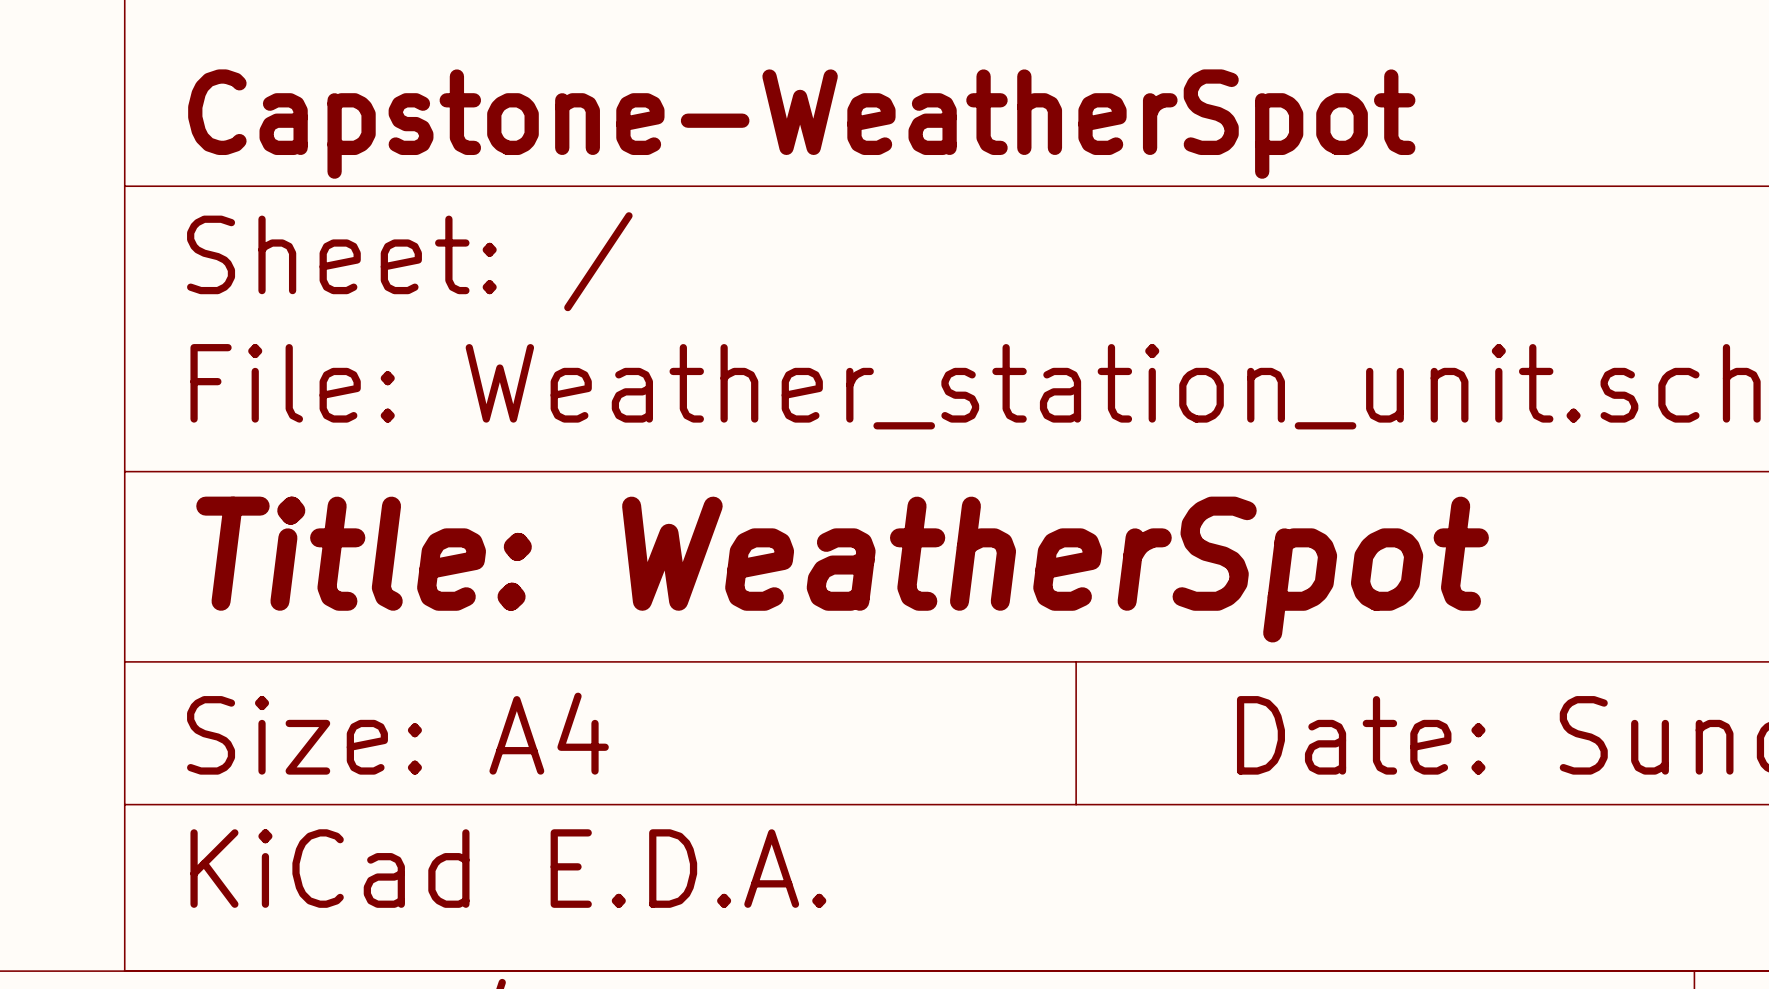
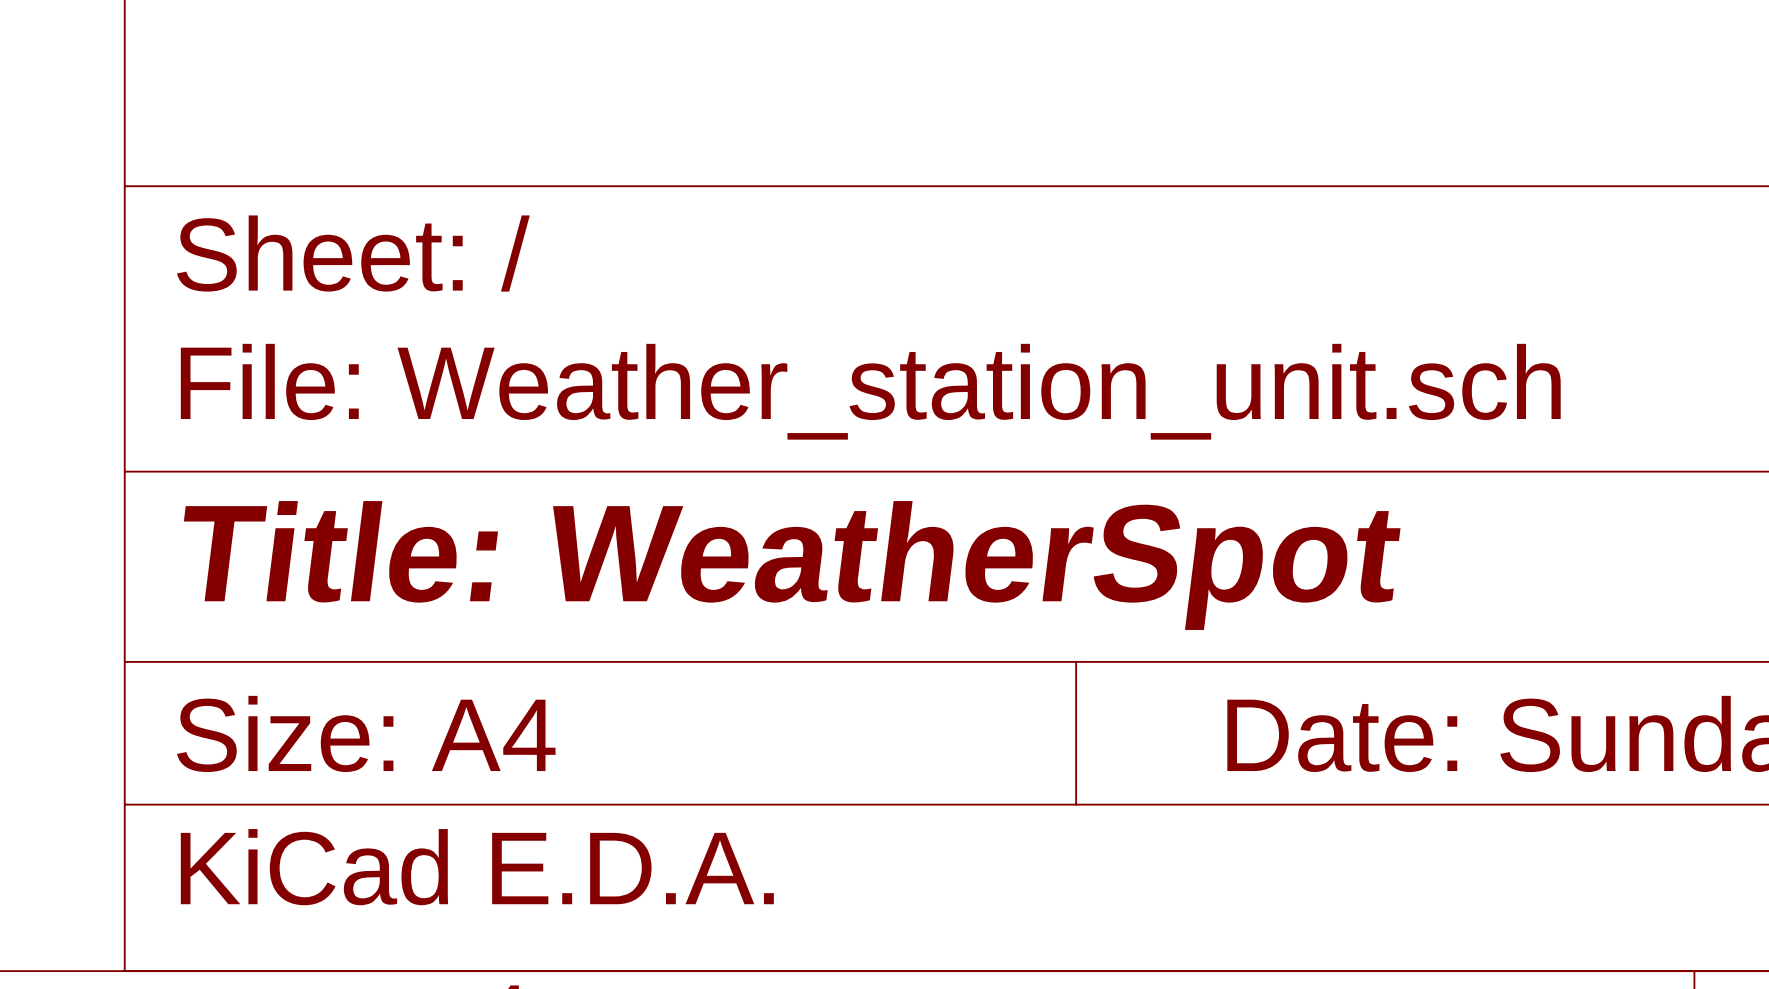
title block: Capstone-WeatherSpot (801, 124) -> none

